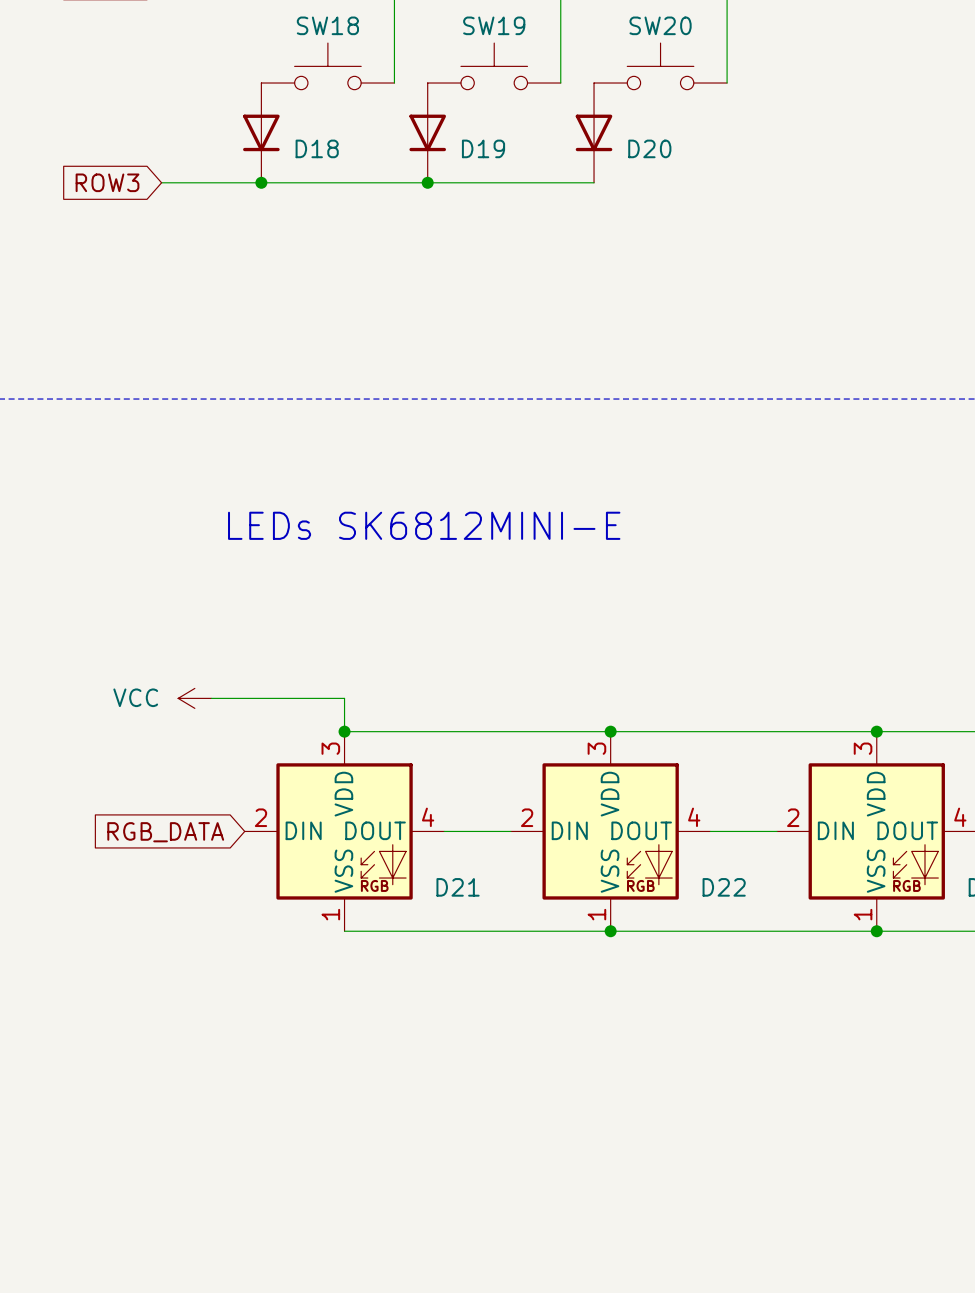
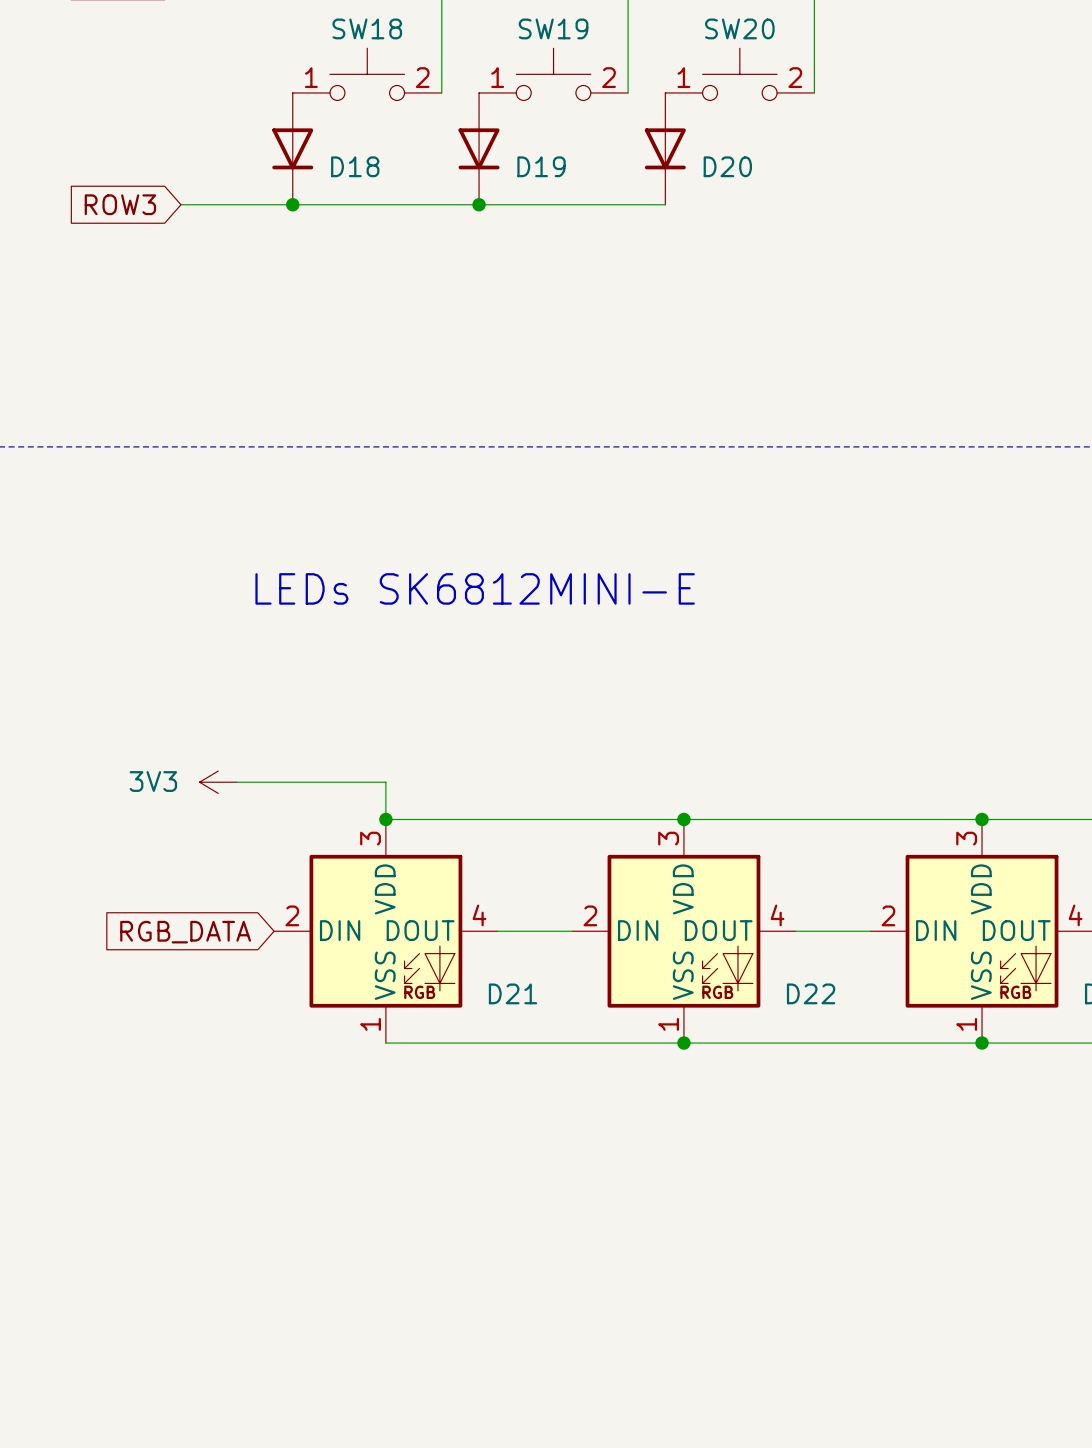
SW18 pin number: none -> 1 (311, 77)
SW18 pin number: none -> 2 (422, 77)
SW19 pin number: none -> 1 (497, 77)
SW19 pin number: none -> 2 (609, 77)
SW20 pin number: none -> 1 (683, 77)
SW20 pin number: none -> 2 (795, 77)
power symbol: VCC (194, 698) -> 3V3 (218, 782)

